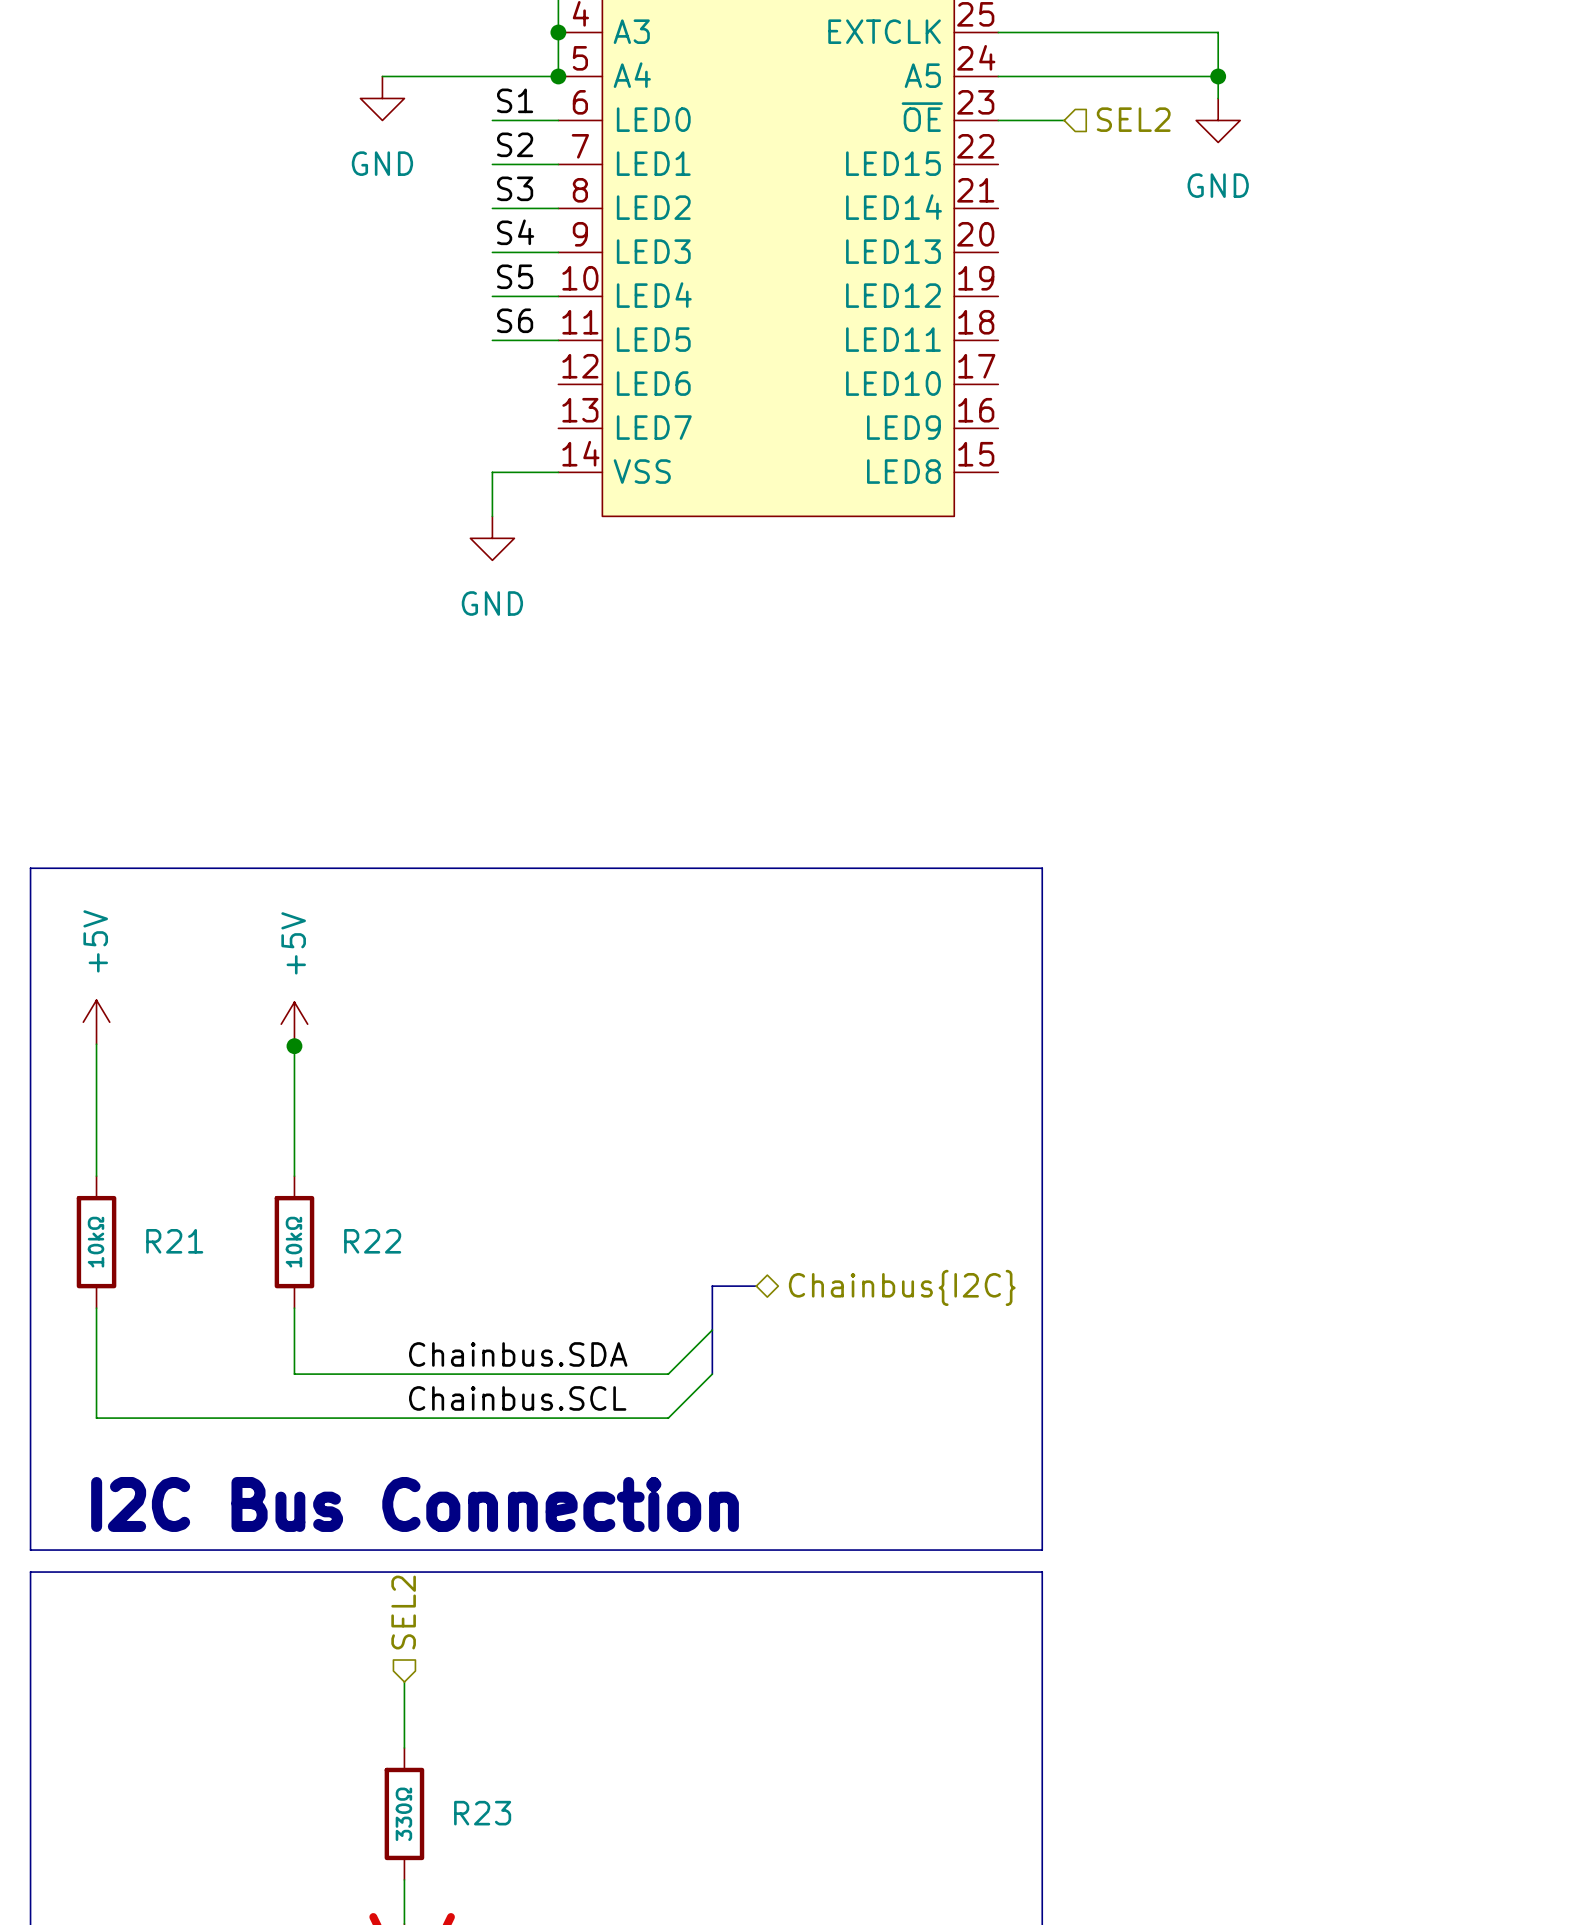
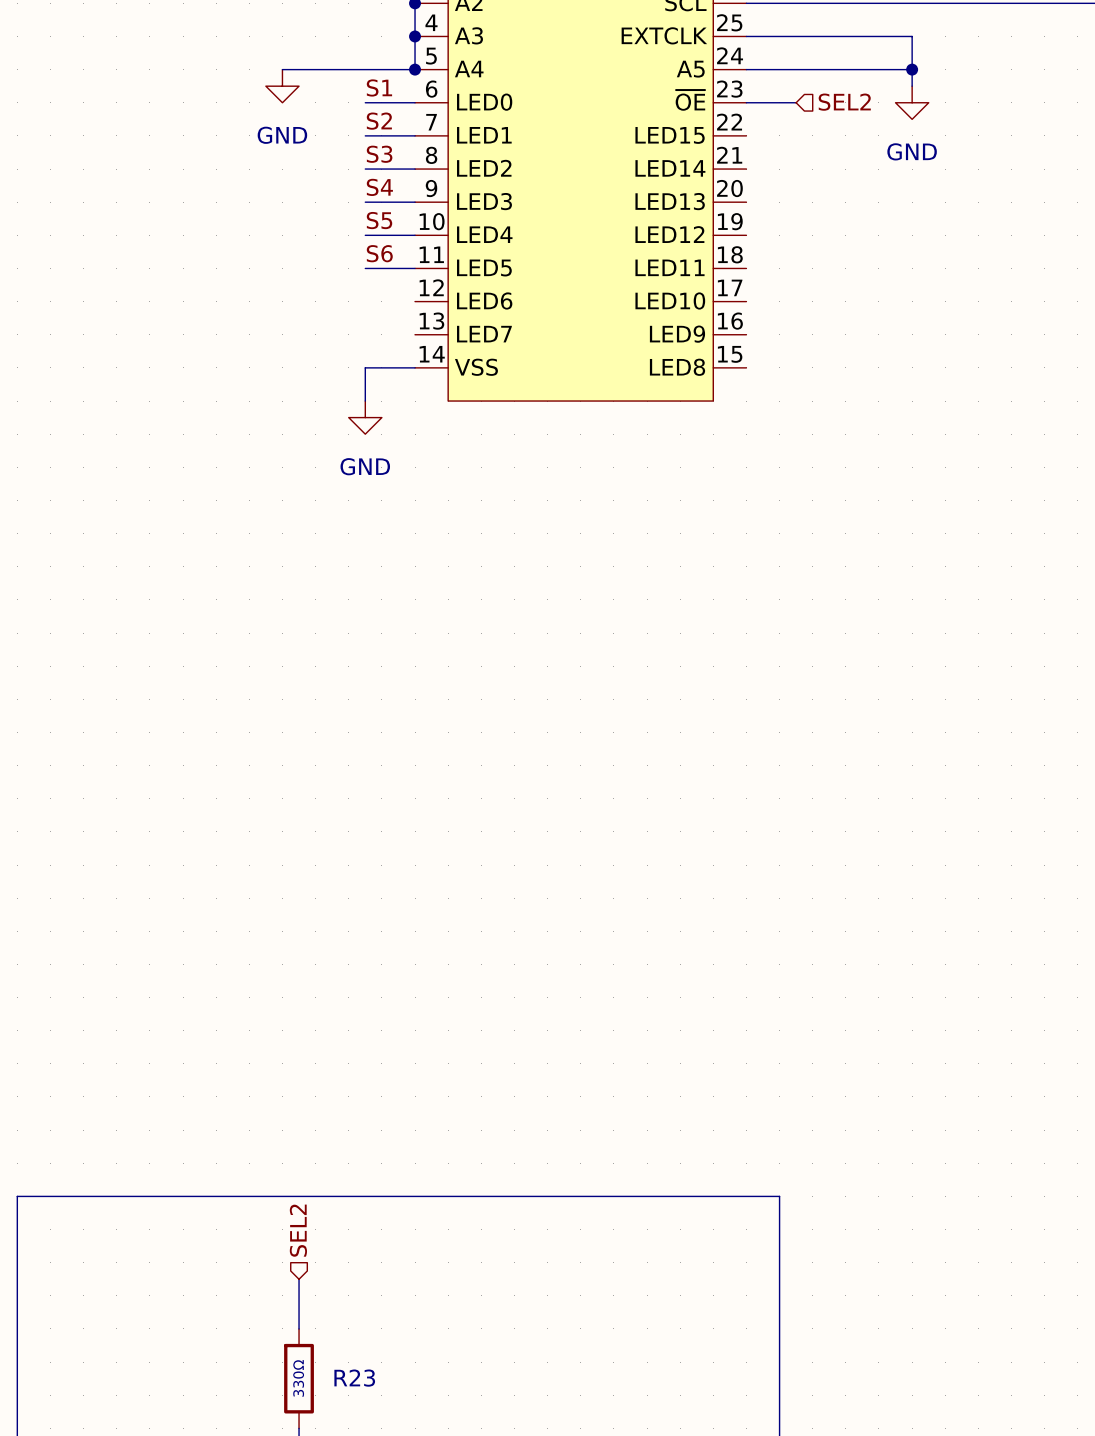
line: (30, 868) (1042, 868) (1042, 1550) (30, 1550) (30, 868) -> none
power symbol: +5V (96, 1022) -> none
power symbol: +5V (294, 1024) -> none
wire: (96, 1044) (96, 1176) -> none
wire: (294, 1044) (294, 1176) -> none
junction: (294, 1046) -> none
R21: 10kΩ (96, 1242) -> none
R22: 10kΩ (294, 1242) -> none
bus: (756, 1286) (712, 1286) (712, 1374) -> none
hierarchical label: Chainbus{I2C} (902, 1287) -> none
wire: (96, 1308) (96, 1418) (668, 1418) (712, 1374) -> none
wire: (294, 1308) (294, 1374) (668, 1374) (712, 1330) -> none
label: Chainbus.SDA (518, 1354) -> none
label: Chainbus.SCL (517, 1398) -> none
text: I2C Bus Connection (415, 1504) -> none

